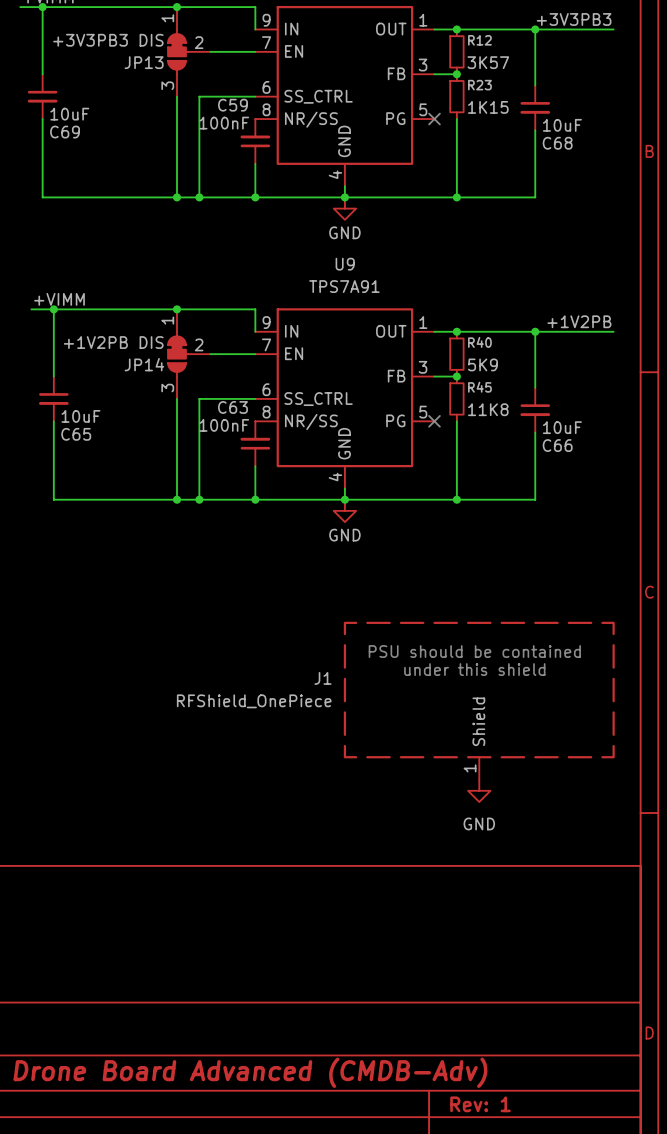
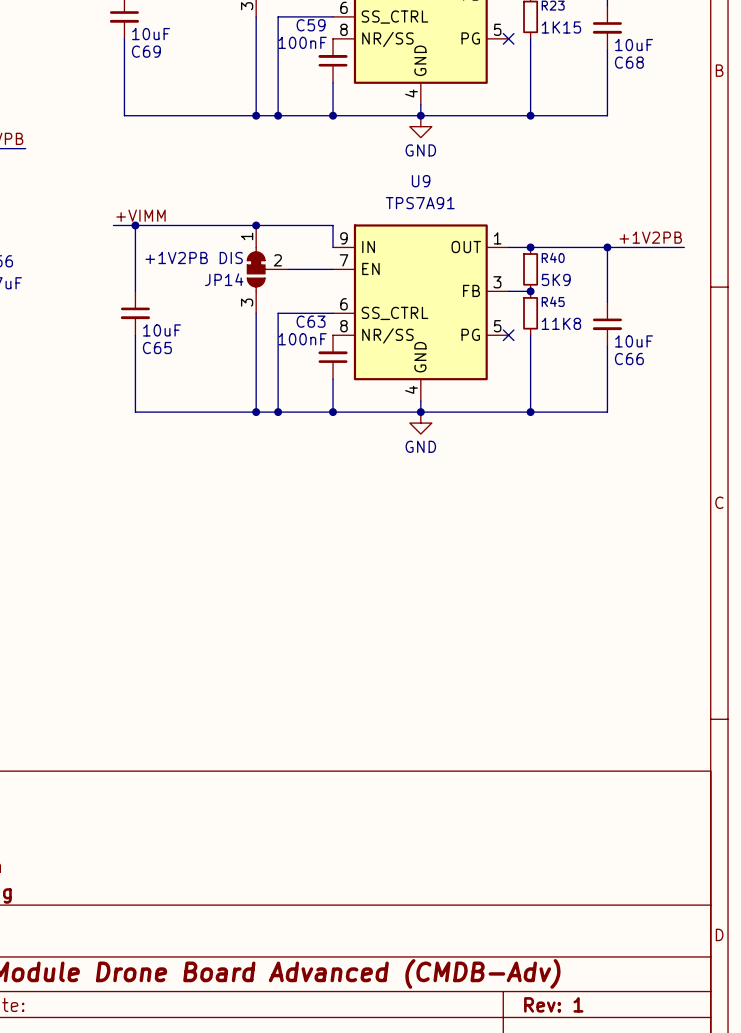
text: PSU should be contained (474, 651) -> none
text: under this shield (474, 669) -> none
J1: RFShield_OnePiece (479, 700) -> none
power symbol: GND (479, 790) -> none

